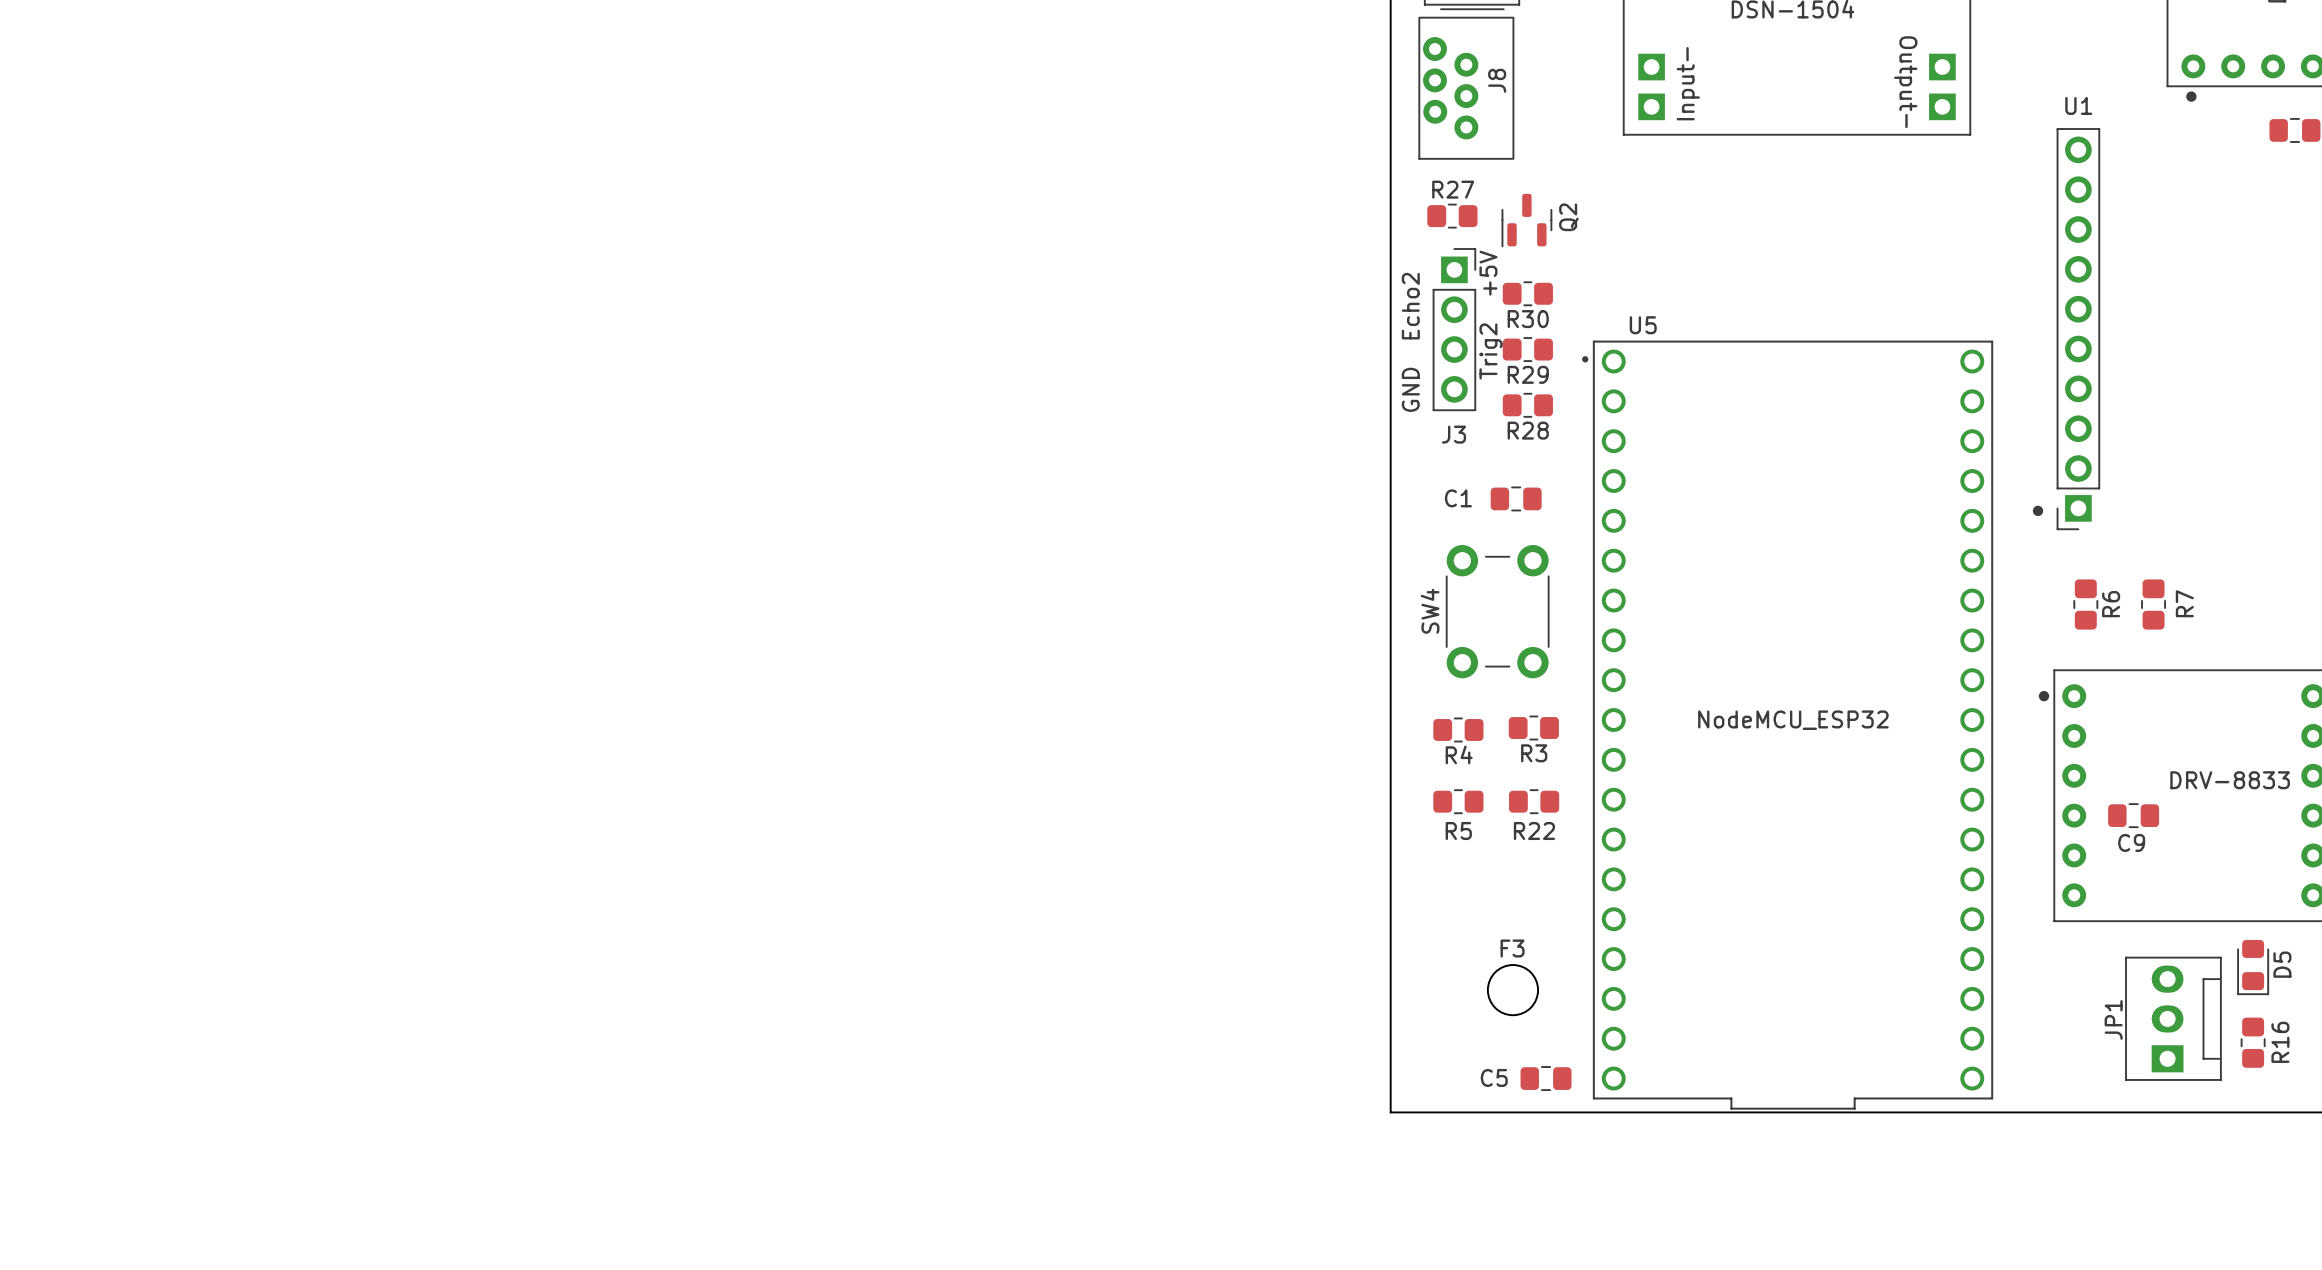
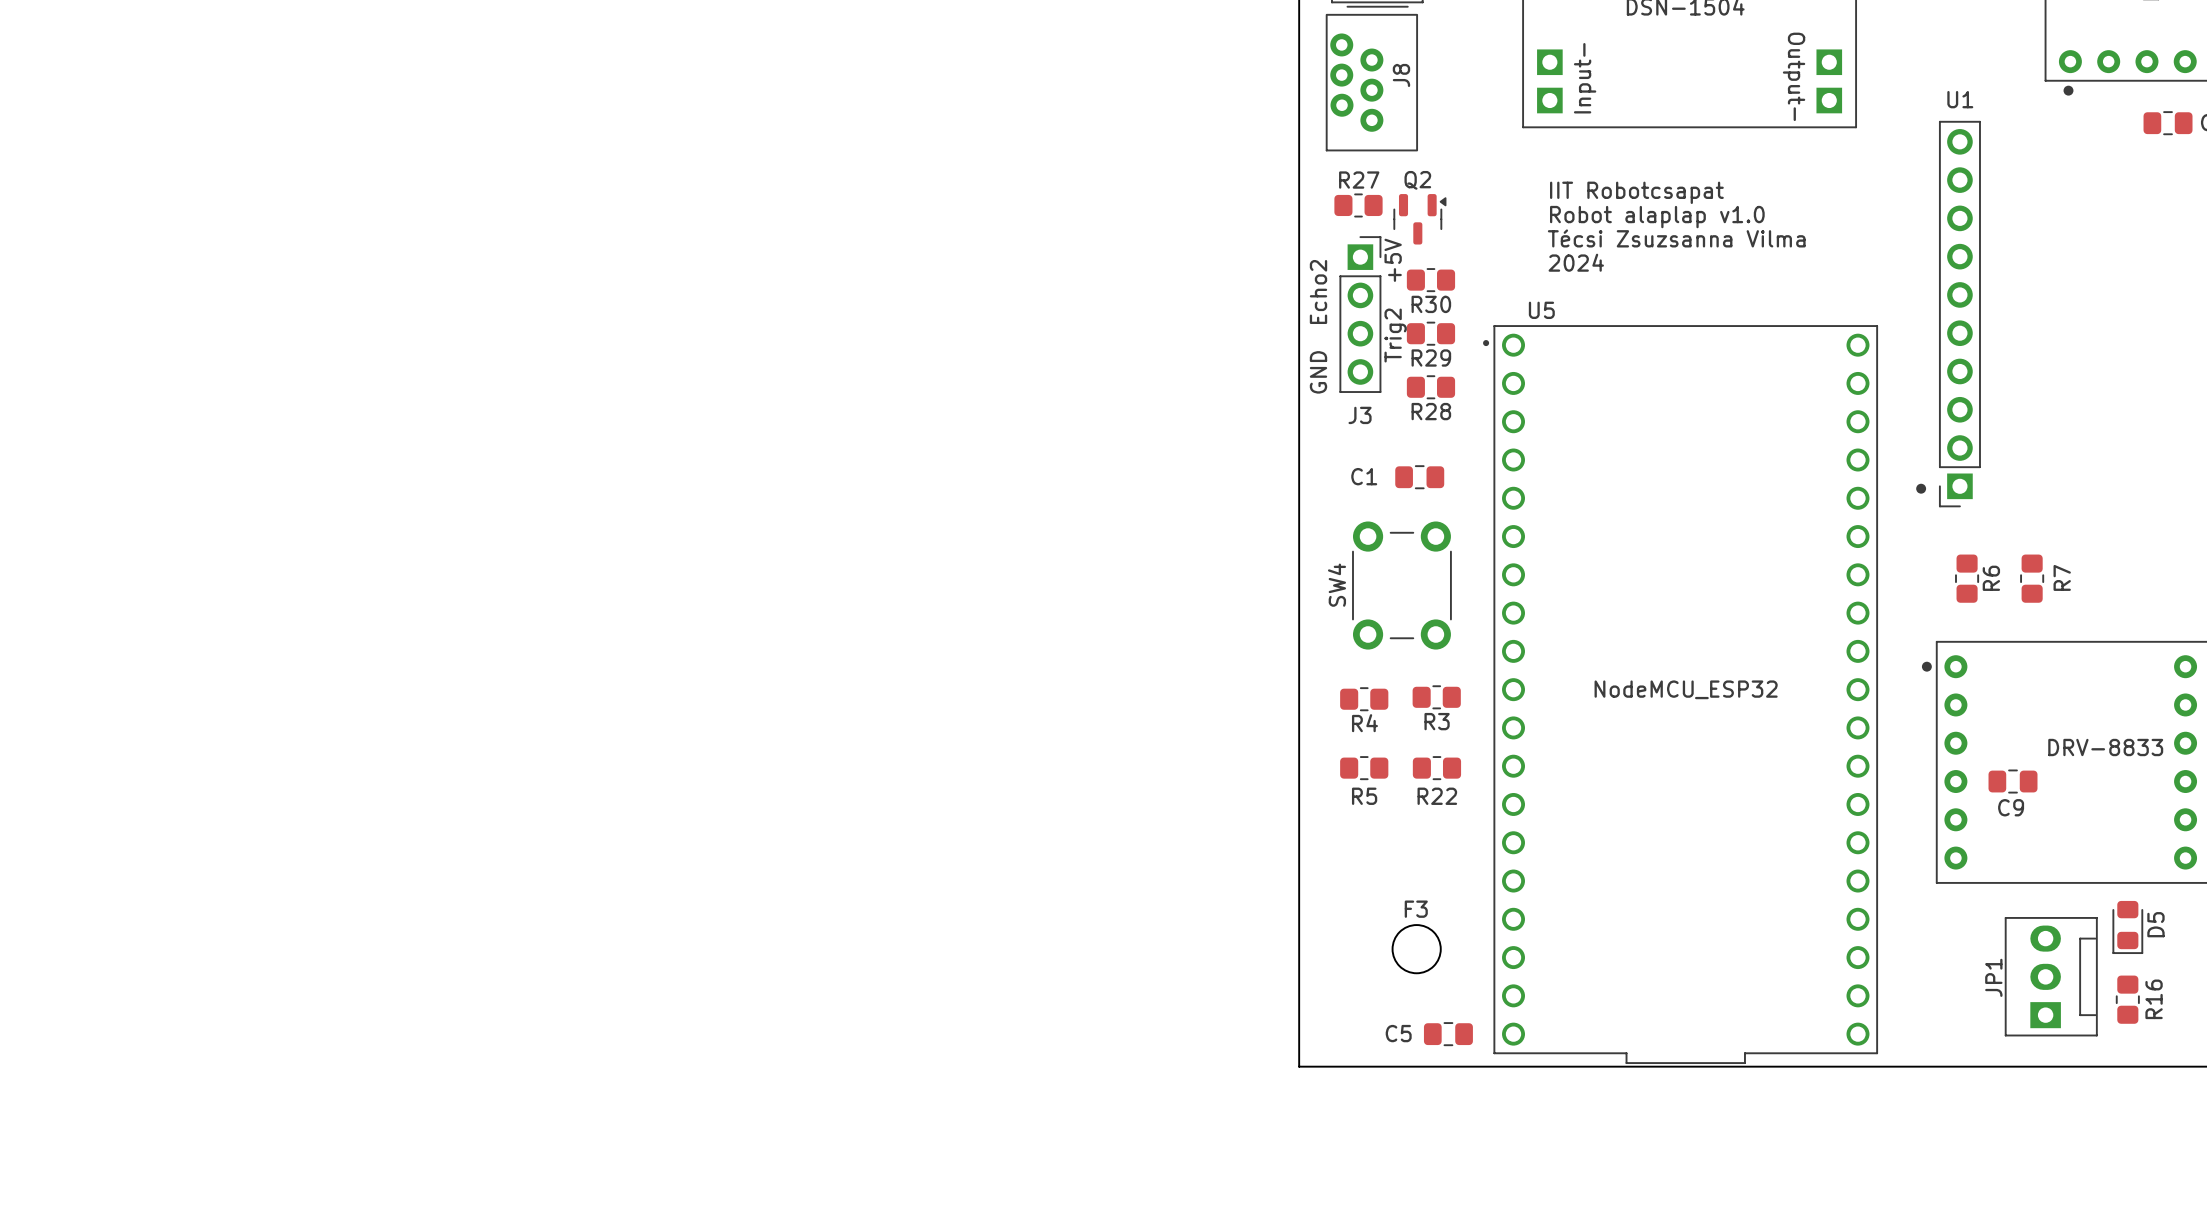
Q2 footprint: [1501, 193, 1553, 248] -> [1393, 194, 1447, 245]
text: none -> IIT Robotcsapat (1636, 192)
Q2 name position: Q2 (1568, 217) -> Q2 (1417, 180)
text: none -> Robot alaplap v1.0 (1657, 217)
text: none -> Técsi Zsuzsanna Vilma (1676, 238)
text: none -> 2024 (1576, 262)

